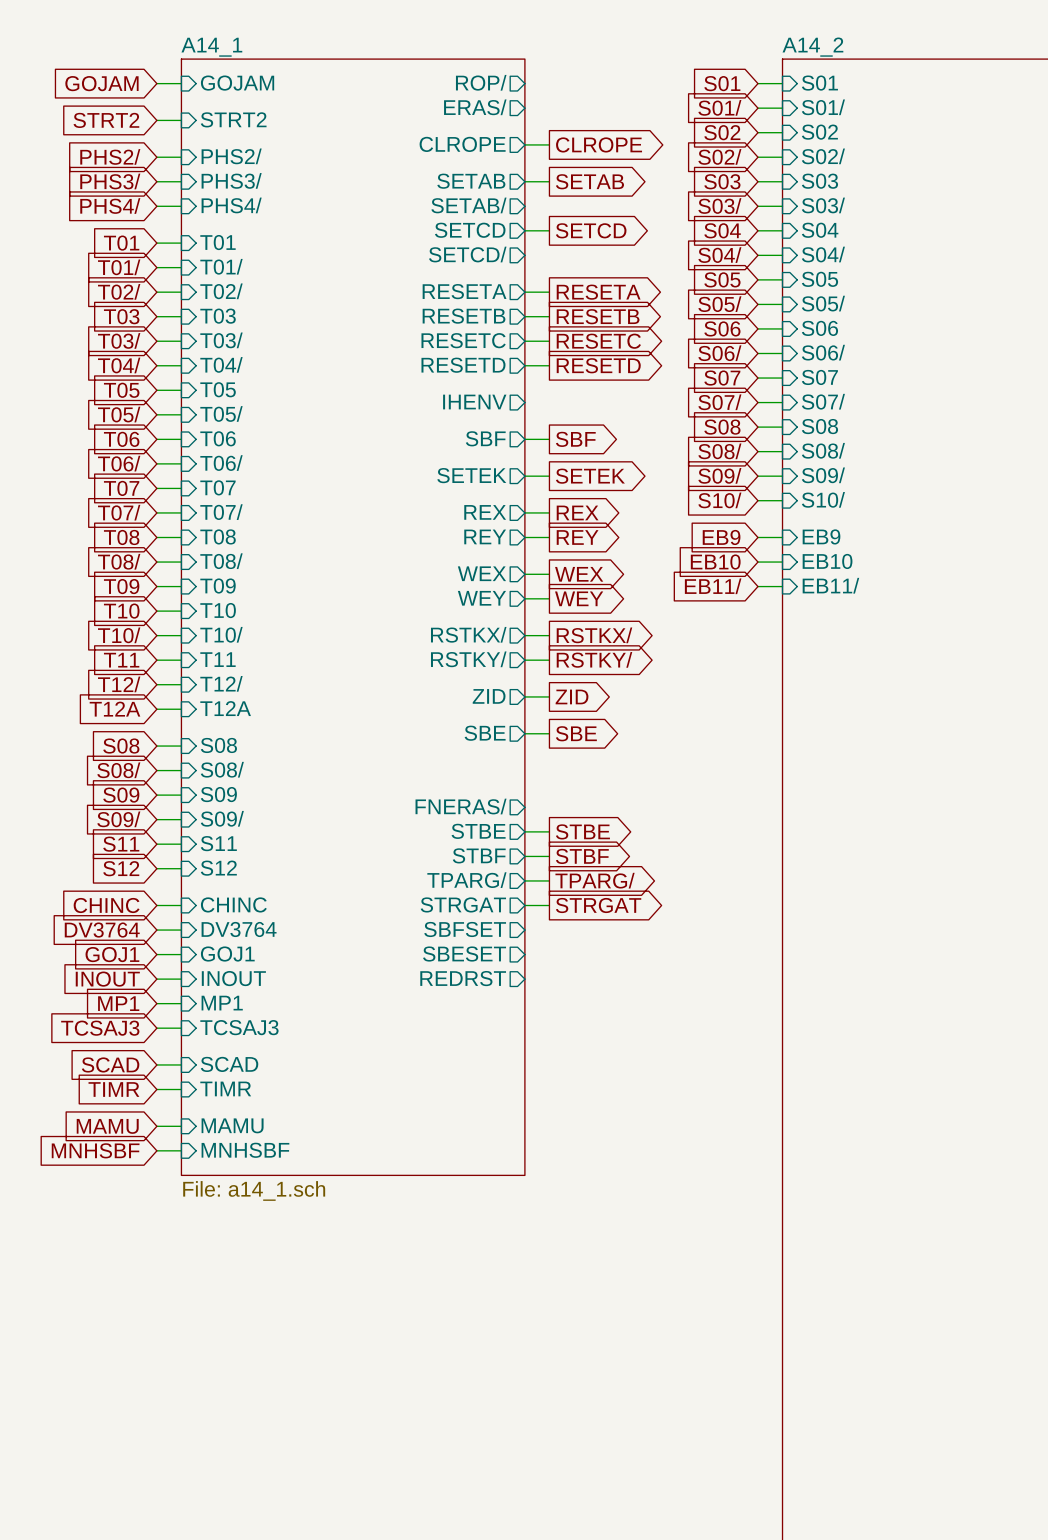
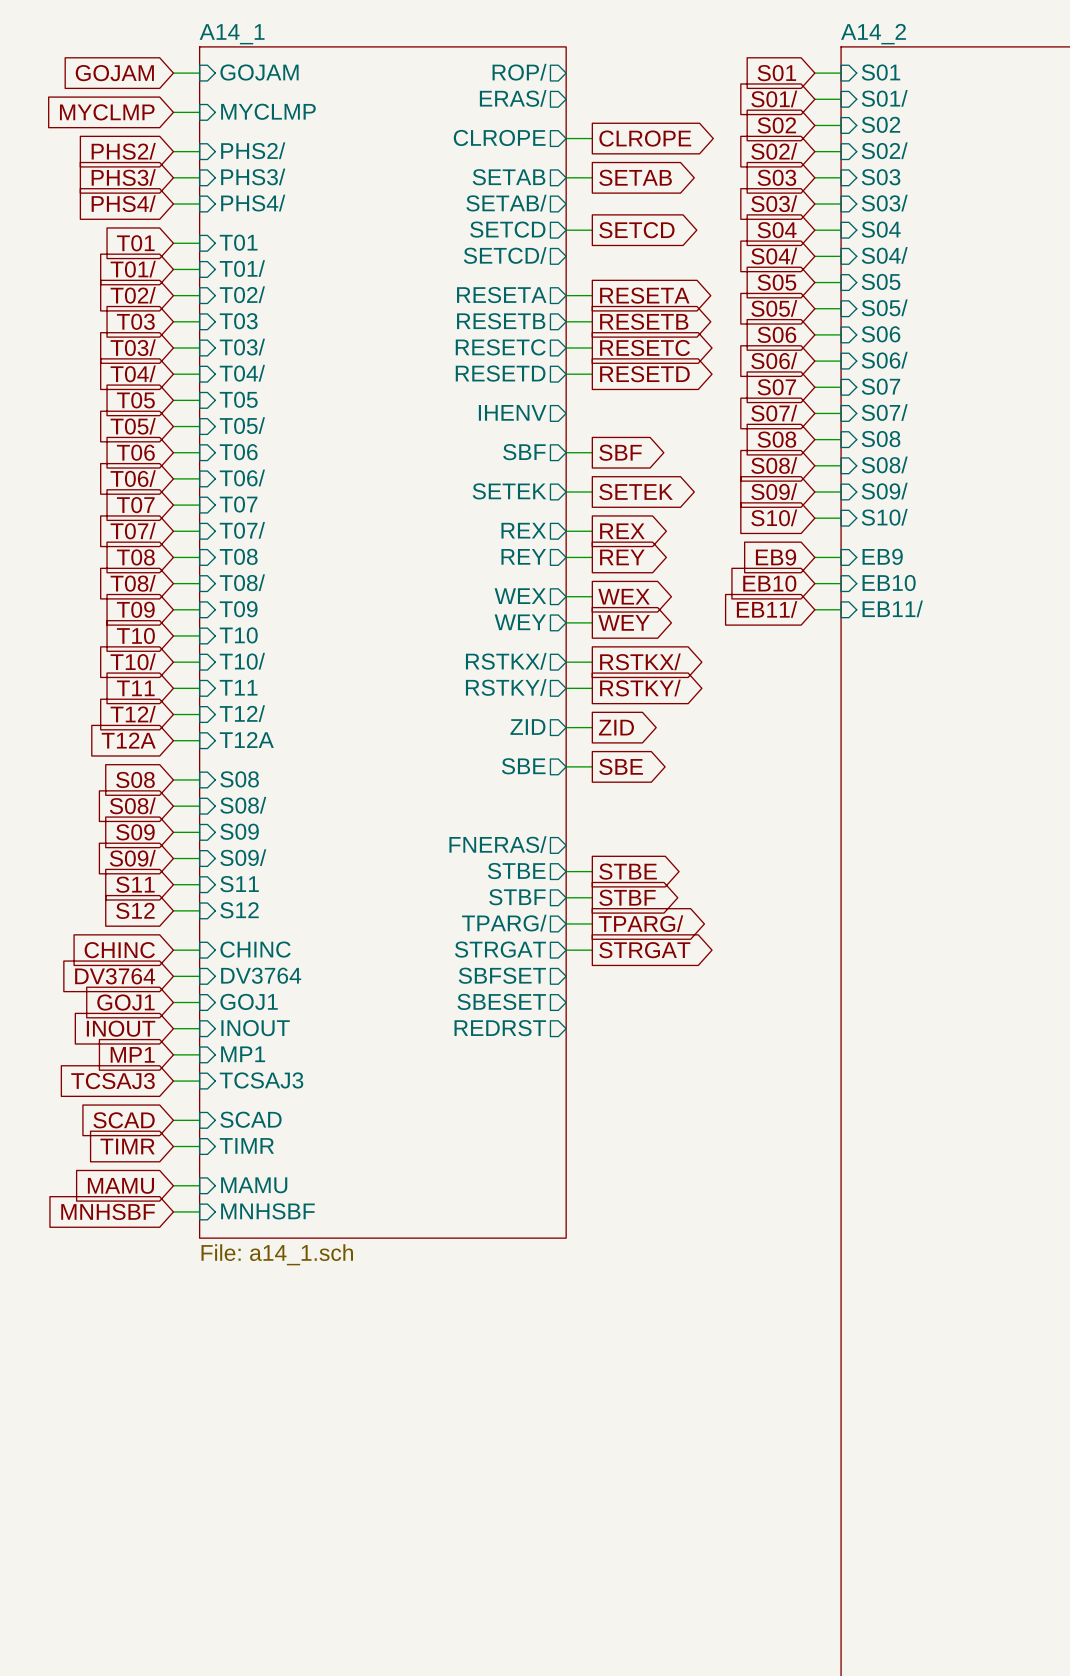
sheet pin: STRT2 (233, 119) -> MYCLMP (268, 111)
global label: STRT2 (106, 120) -> MYCLMP (107, 112)

